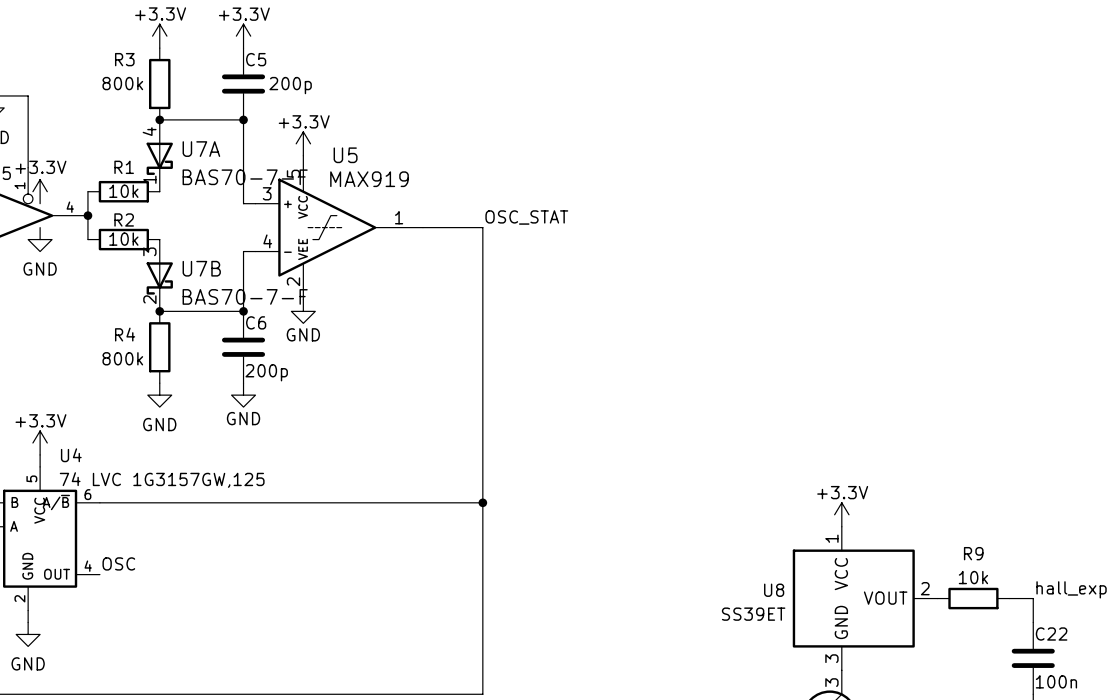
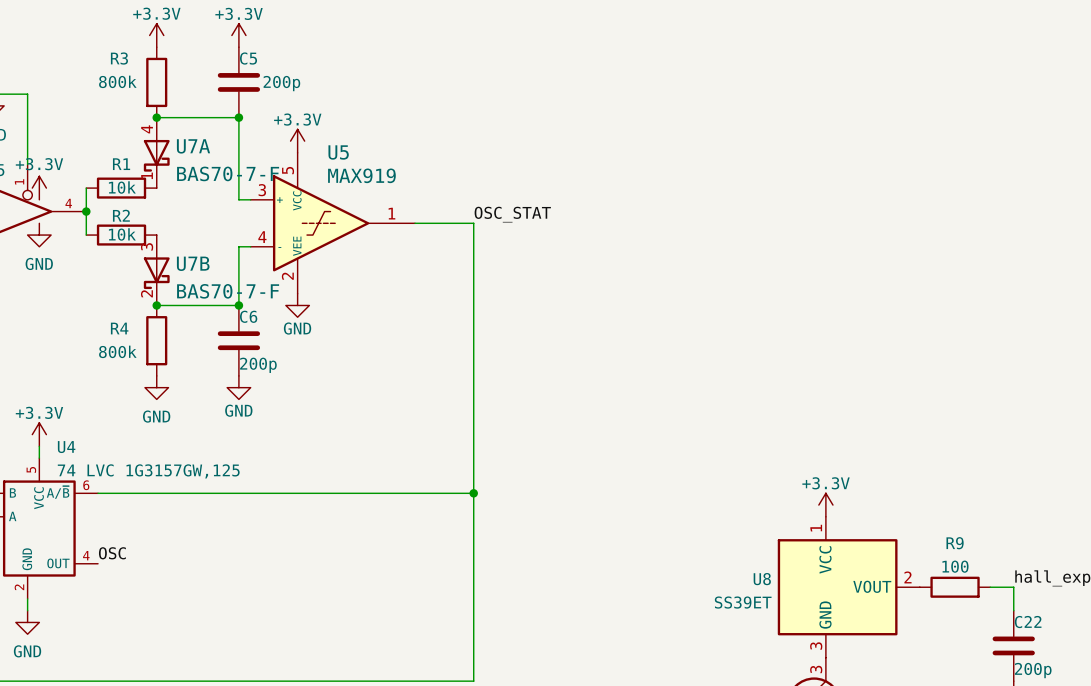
R9 value: 10k (973, 577) -> 100 (955, 566)
C22 value: 100n (1056, 681) -> 200p (1033, 670)

